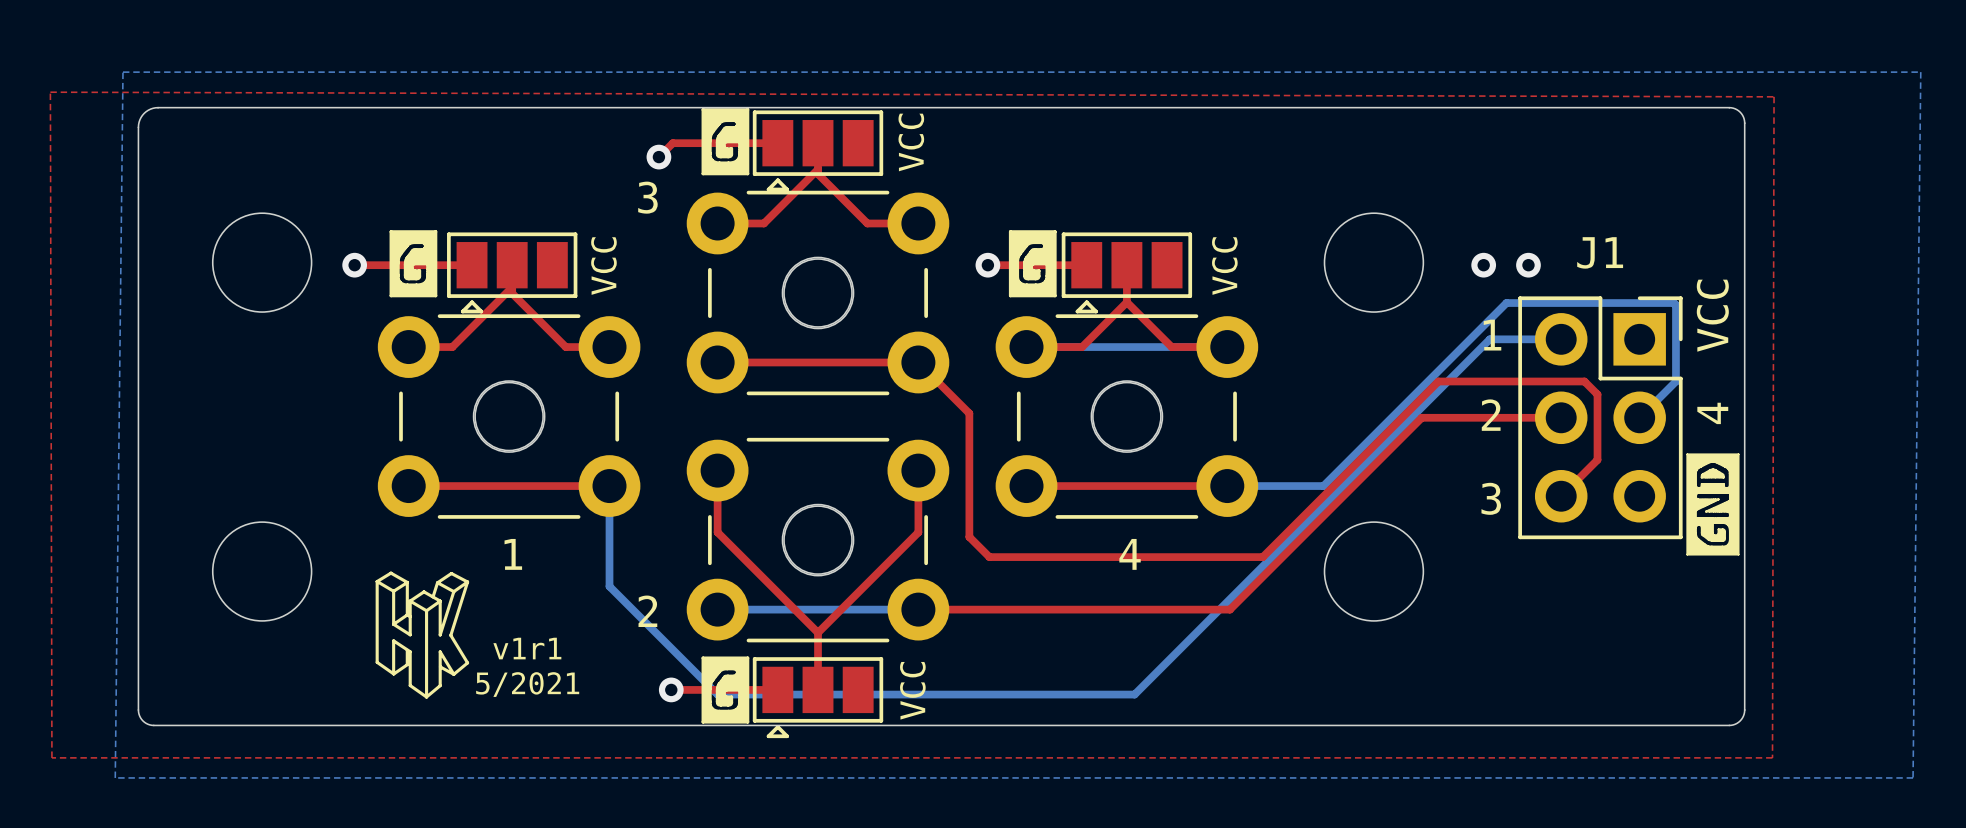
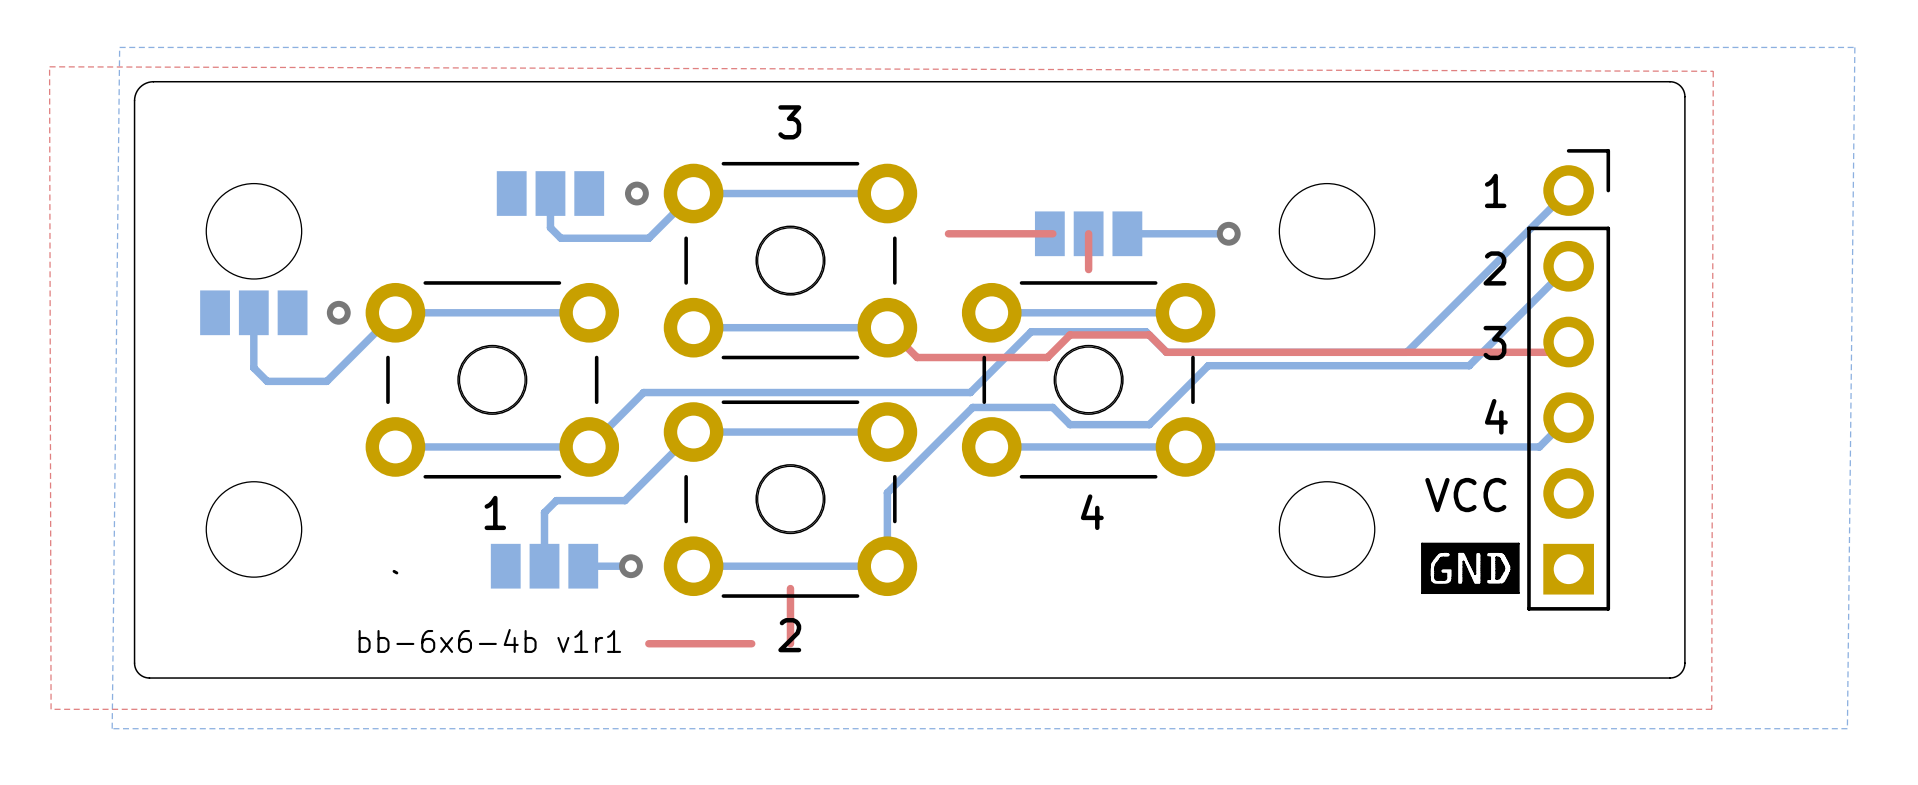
drawing: [701, 108, 750, 176] -> none
text: VCC (911, 142) -> none
top track: (777, 143) (672, 143) (658, 157) -> none
top track: (818, 143) (818, 174) (867, 223) (918, 223) -> none
part side: top (818, 150) -> bottom (550, 193)
via position: (658, 157) -> (636, 193)
top track: (818, 169) (763, 223) (717, 223) -> none
text position: 3 (647, 197) -> 3 (789, 122)
bottom track: none -> (1568, 190) (1406, 352) (1166, 352) (1146, 331) (1031, 331) (970, 392) (643, 392) (589, 446) (395, 446)
bottom track: none -> (550, 193) (550, 227) (560, 238) (648, 238) (693, 193) (887, 193)
drawing: [389, 230, 438, 298] -> none
drawing: [1008, 230, 1057, 298] -> none
top track: (354, 265) (472, 265) -> none
via position: (354, 265) -> (338, 312)
top track: (512, 265) (512, 293) (565, 347) (609, 347) -> none
via: (987, 265) -> none
bottom track: none -> (1127, 233) (1231, 233)
via: none -> (1228, 233)
via: (1483, 265) -> none
via: (1528, 265) -> none
text: VCC (603, 266) -> none
text: VCC (1224, 266) -> none
part side: top (512, 272) -> bottom (253, 312)
part side: top (1126, 272) -> bottom (1088, 233)
top track: (512, 287) (452, 347) (408, 347) -> none
bottom track: none -> (1568, 266) (1469, 365) (1208, 365) (1149, 424) (1070, 424) (1052, 407) (972, 407) (887, 492) (887, 566)
text: VCC (1712, 315) -> none
text position: 1 (1492, 335) -> 1 (1495, 190)
bottom track: (1561, 339) (1489, 339) (1134, 694) (717, 694) (609, 586) (609, 486) -> none
bottom track: none -> (253, 312) (253, 367) (267, 381) (326, 381) (395, 312) (589, 312)
top track: (1026, 347) (1082, 347) (1126, 302) (1171, 347) (1227, 347) -> none
top track: (717, 362) (918, 362) -> none
bottom track: none -> (693, 327) (887, 327)
top track: (949, 393) (969, 413) (969, 537) (989, 557) (1262, 557) (1438, 381) (1584, 381) (1597, 394) (1597, 459) (1561, 496) -> (917, 357) (1047, 357) (1070, 334) (1149, 334) (1166, 352) (1558, 352) (1568, 342)
text rotation: 0° (1712, 413) -> 90° clockwise (1496, 416)
text position: 4 (1712, 413) -> 4 (1496, 416)
text position: 2 (1491, 415) -> 2 (1494, 268)
part: none -> (1568, 379)
top track: (1561, 417) (1421, 417) (1229, 609) (918, 609) -> none
J1: (1600, 417) -> none
bottom track: (1639, 417) (1675, 381) (1675, 305) (1673, 303) (1506, 303) (1323, 486) -> (1568, 417) (1539, 446) (1278, 446)
drawing: [1686, 453, 1740, 556] -> none
top track: (717, 470) (717, 532) (818, 632) (918, 532) (918, 470) -> none
bottom track: none -> (887, 432) (693, 432) (625, 500) (556, 500) (544, 512) (544, 566)
top track: (408, 486) (609, 486) -> none
top track: (1026, 486) (1227, 486) -> none
bottom track: none -> (991, 446) (1185, 446)
text position: 3 (1491, 498) -> 3 (1494, 342)
text: none -> VCC (1465, 495)
line: (377, 581) (393, 591) -> none
line: (377, 581) (390, 573) (407, 582) -> none
line: (377, 581) (377, 662) (393, 673) (393, 640) (410, 651) (410, 685) (426, 697) -> none
line: (407, 582) (393, 591) -> none
line: (407, 582) (407, 614) (393, 624) -> none
line: (437, 582) (433, 596) -> none
line: (467, 582) (453, 591) -> none
line: (467, 582) (451, 573) (437, 582) (453, 591) -> none
line: (467, 582) (450, 635) (467, 662) (453, 674) -> none
drawing: none -> [1421, 542, 1520, 595]
line: (393, 591) (393, 624) -> none
line: (453, 591) (440, 634) (440, 601) (426, 610) -> none
line: (410, 601) (423, 591) (440, 601) -> none
line: (410, 601) (426, 610) -> none
line: (410, 601) (410, 634) (393, 624) -> none
bottom track: none -> (583, 566) (630, 566)
line: (426, 610) (426, 697) -> none
text position: 2 (647, 611) -> 2 (789, 635)
text: v1r1 (527, 648) -> none
line: (407, 650) (407, 664) -> none
drawing: [701, 656, 750, 724] -> none
line: (407, 664) (393, 673) -> none
line: (440, 667) (453, 674) -> none
line: (453, 674) (440, 651) (440, 685) (426, 697) -> none
text: 5/2021 (527, 684) -> none
text: none -> bb-6x6-4b v1r1 (489, 640)
via position: (671, 689) -> (630, 566)
text: VCC (912, 690) -> none
part side: top (818, 697) -> bottom (544, 566)

